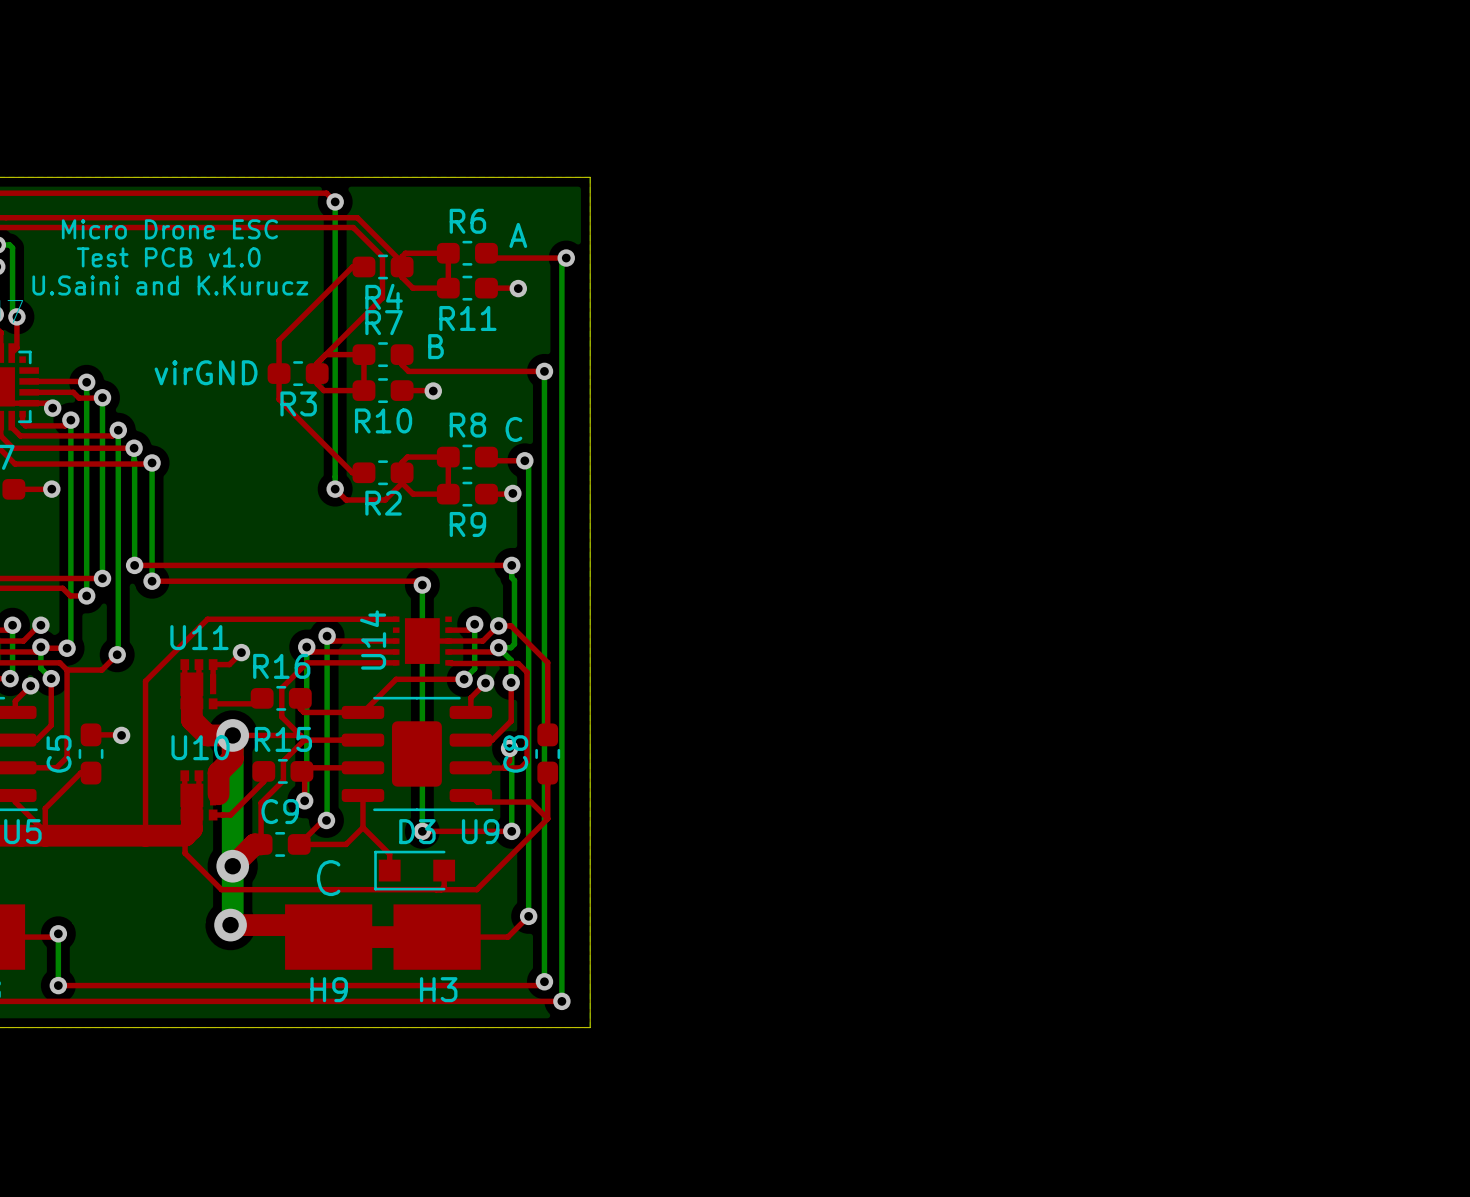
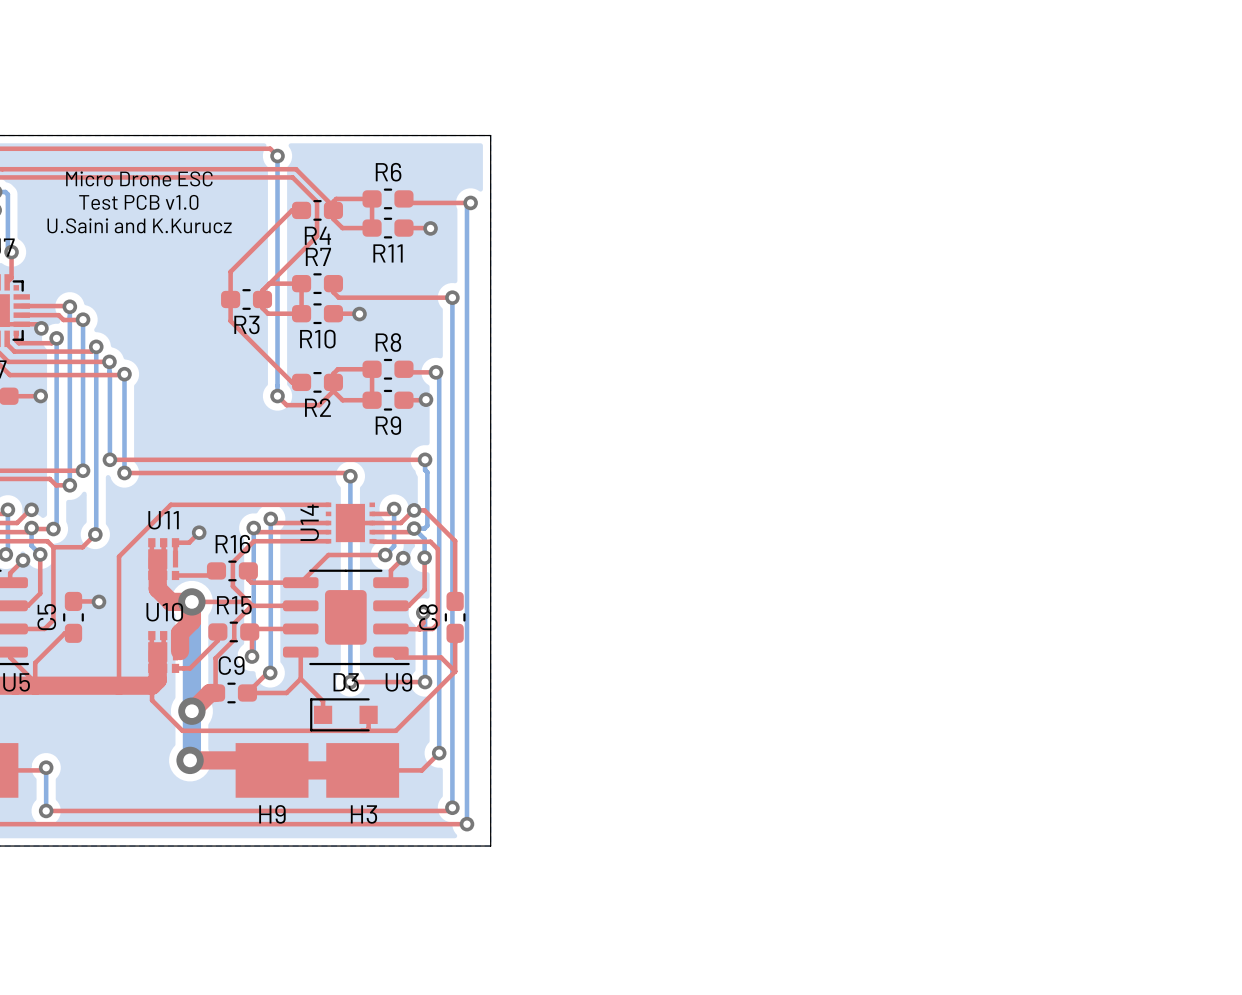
text: A (518, 235) -> none
text: B (435, 346) -> none
text: virGND (206, 372) -> none
text: C (513, 429) -> none
text: C (328, 878) -> none

